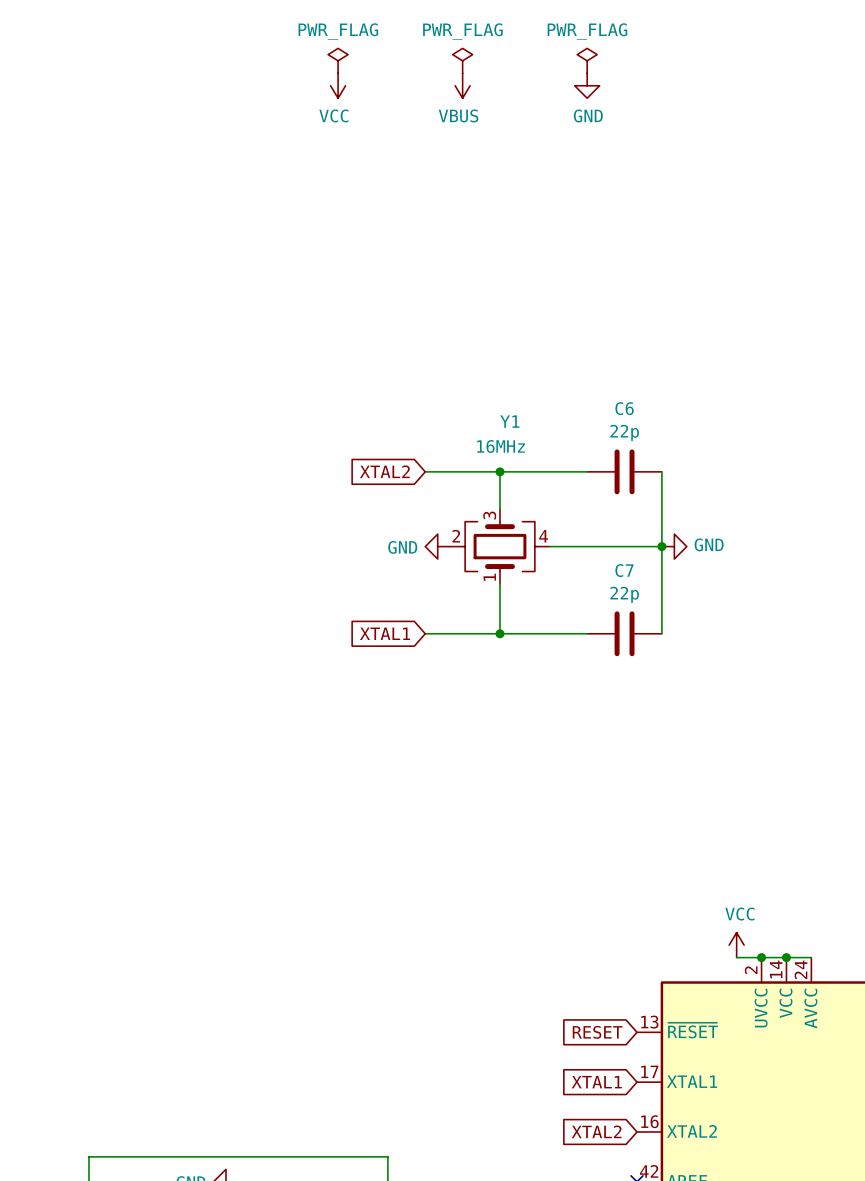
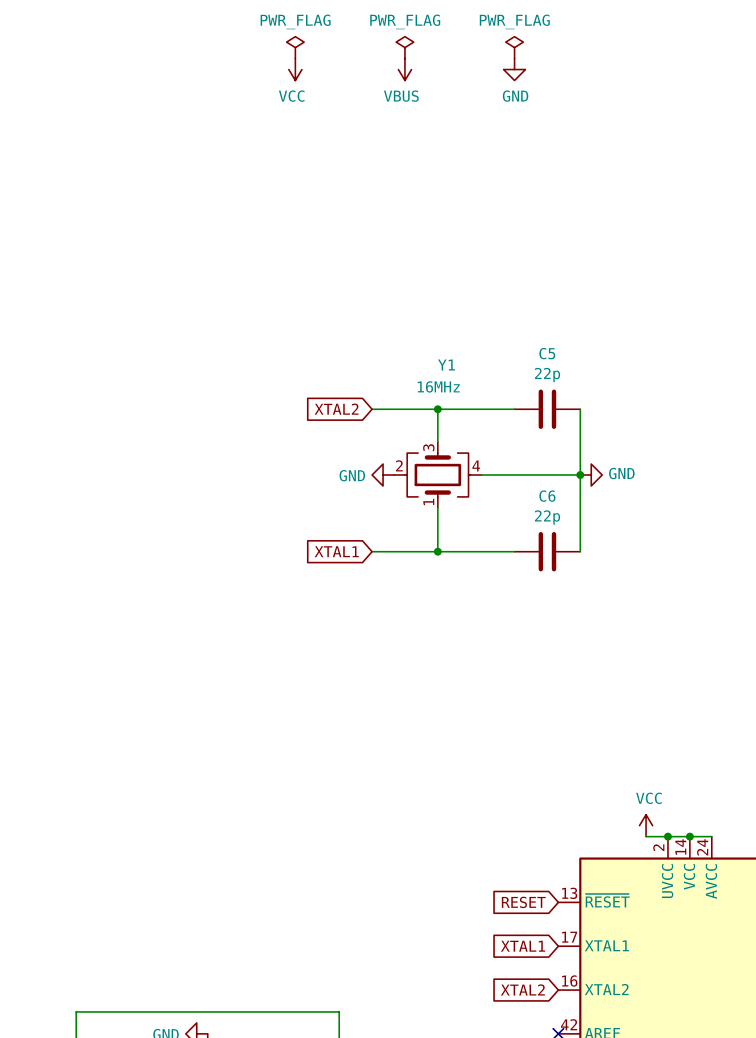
C6 name: C6 (624, 408) -> C5 (547, 353)
C7 name: C7 (624, 570) -> C6 (547, 496)

